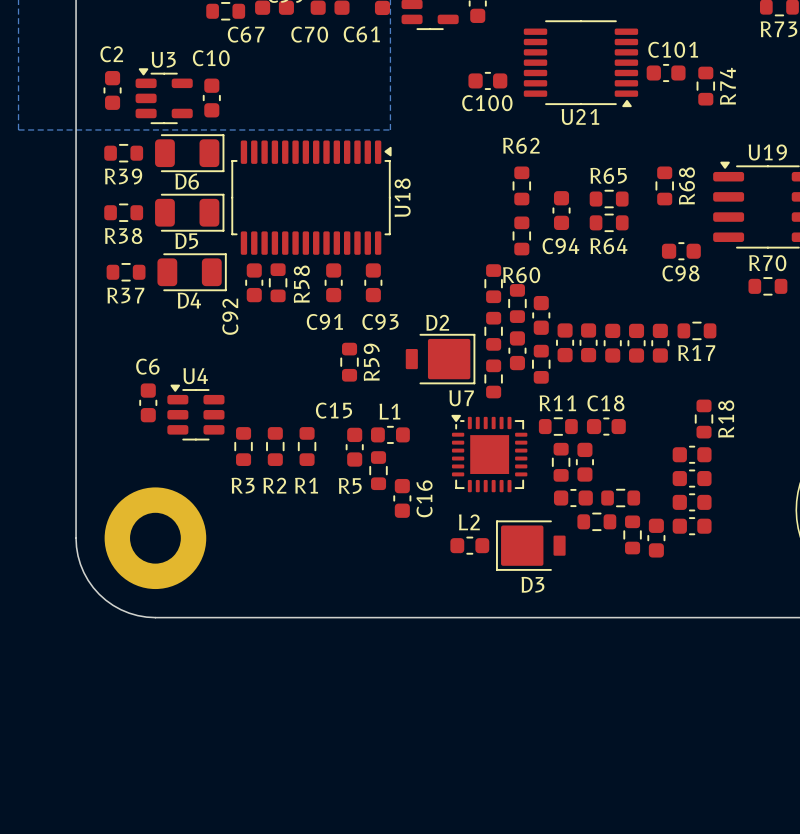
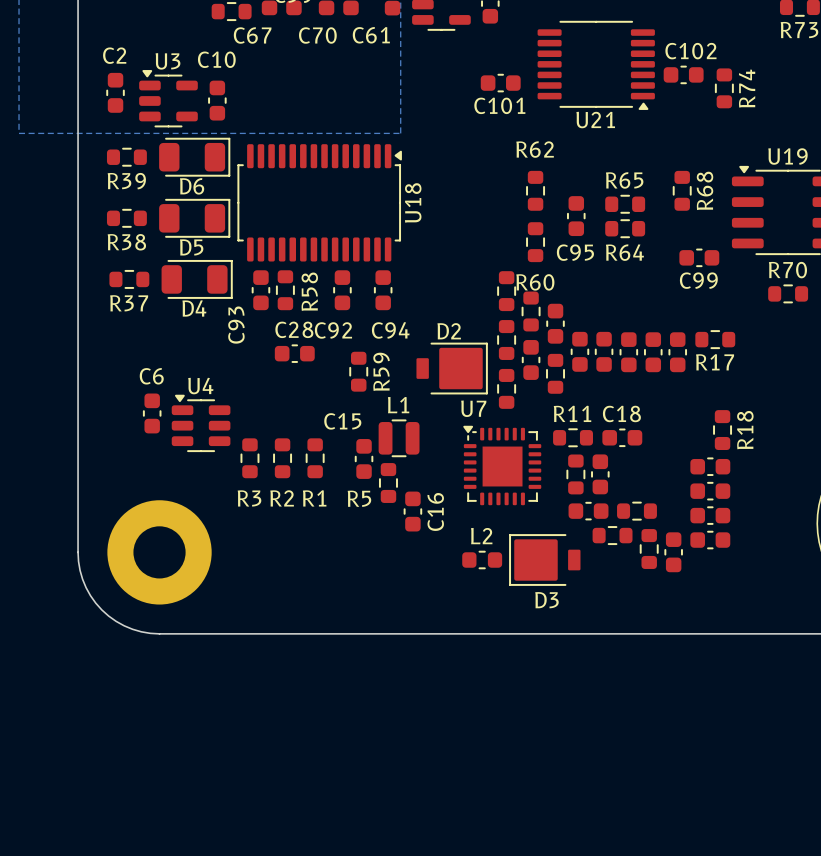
C101 name: C101 (673, 49) -> C102 (690, 51)
C100 name: C100 (487, 103) -> C101 (499, 105)
C94 name: C94 (560, 246) -> C95 (575, 252)
C98 name: C98 (680, 273) -> C99 (698, 280)
C92 name: C92 (230, 316) -> C93 (236, 325)
C91 name: C91 (324, 321) -> C92 (333, 330)
C93 name: C93 (380, 321) -> C94 (390, 330)
C28: none -> (294, 353)
L1 footprint: [370, 425, 410, 444] -> [378, 419, 420, 458]

